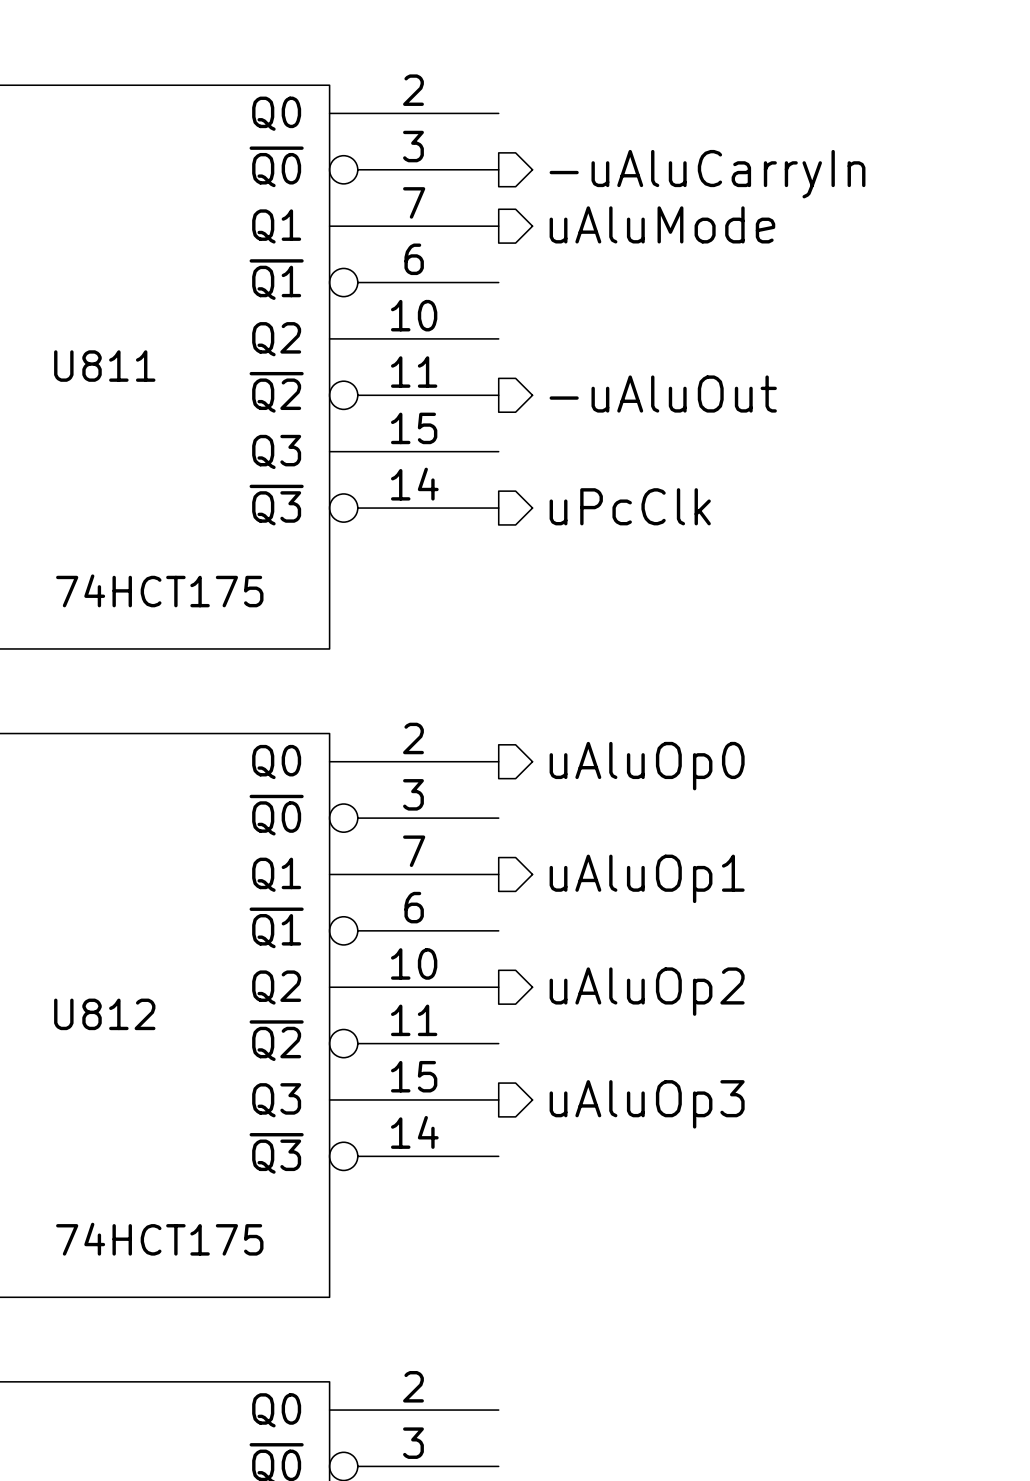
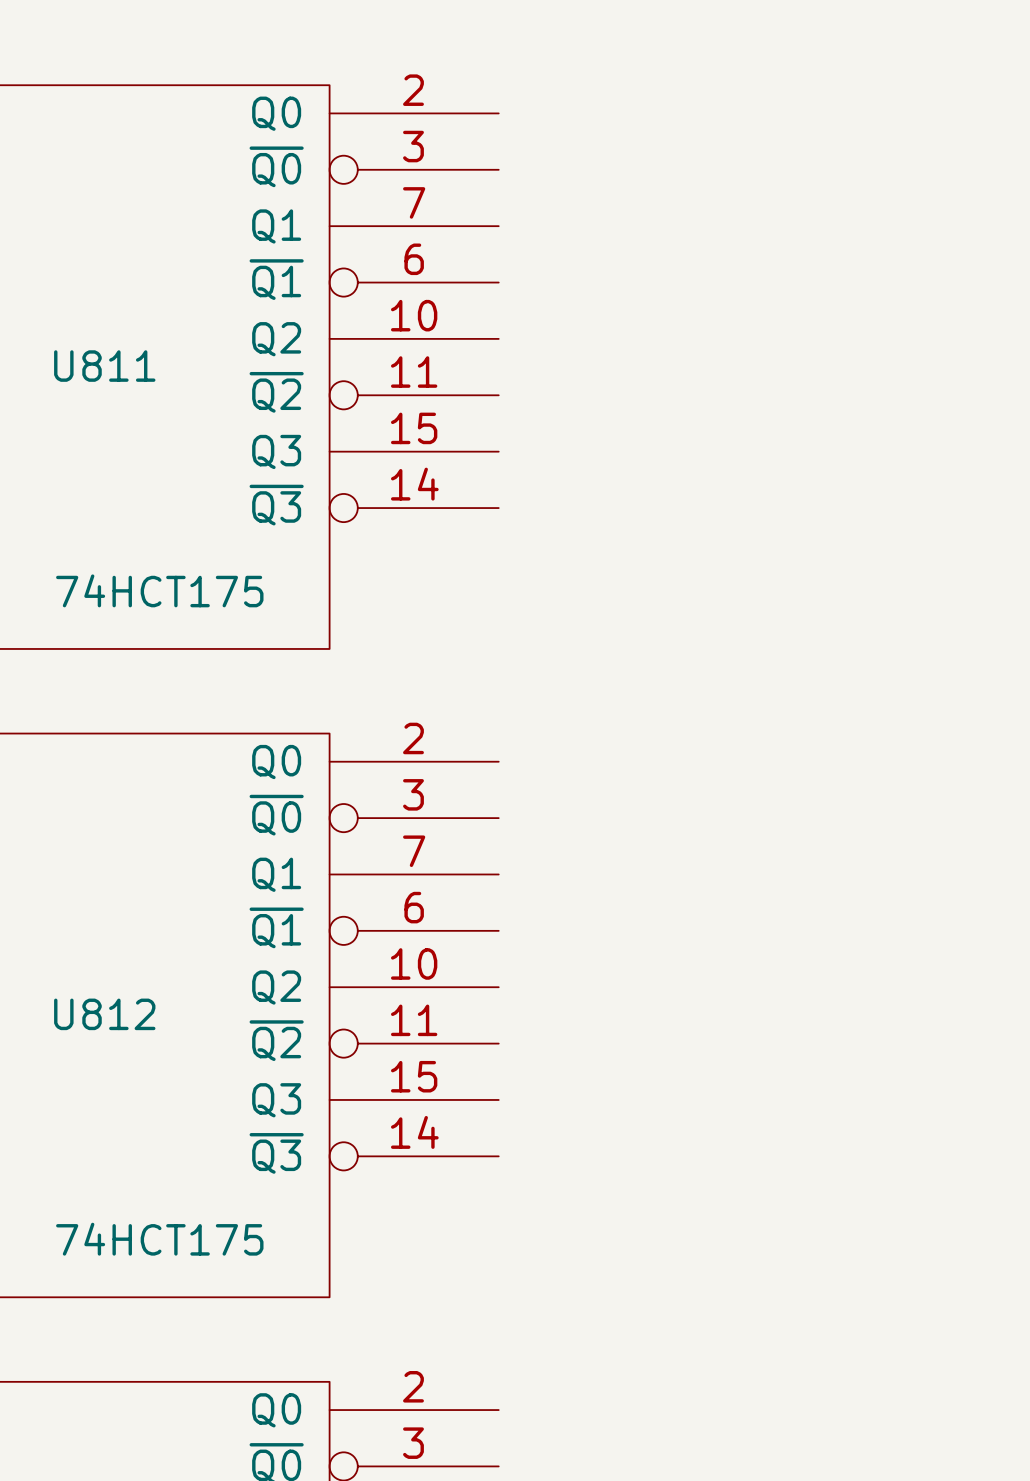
hierarchical label: -uAluCarryIn (707, 174) -> none
hierarchical label: uAluMode (662, 224) -> none
hierarchical label: -uAluOut (663, 394) -> none
hierarchical label: uPcClk (630, 506) -> none
hierarchical label: uAluOp0 (647, 766) -> none
hierarchical label: uAluOp1 (647, 878) -> none
hierarchical label: uAluOp2 (647, 991) -> none
hierarchical label: uAluOp3 (647, 1104) -> none

